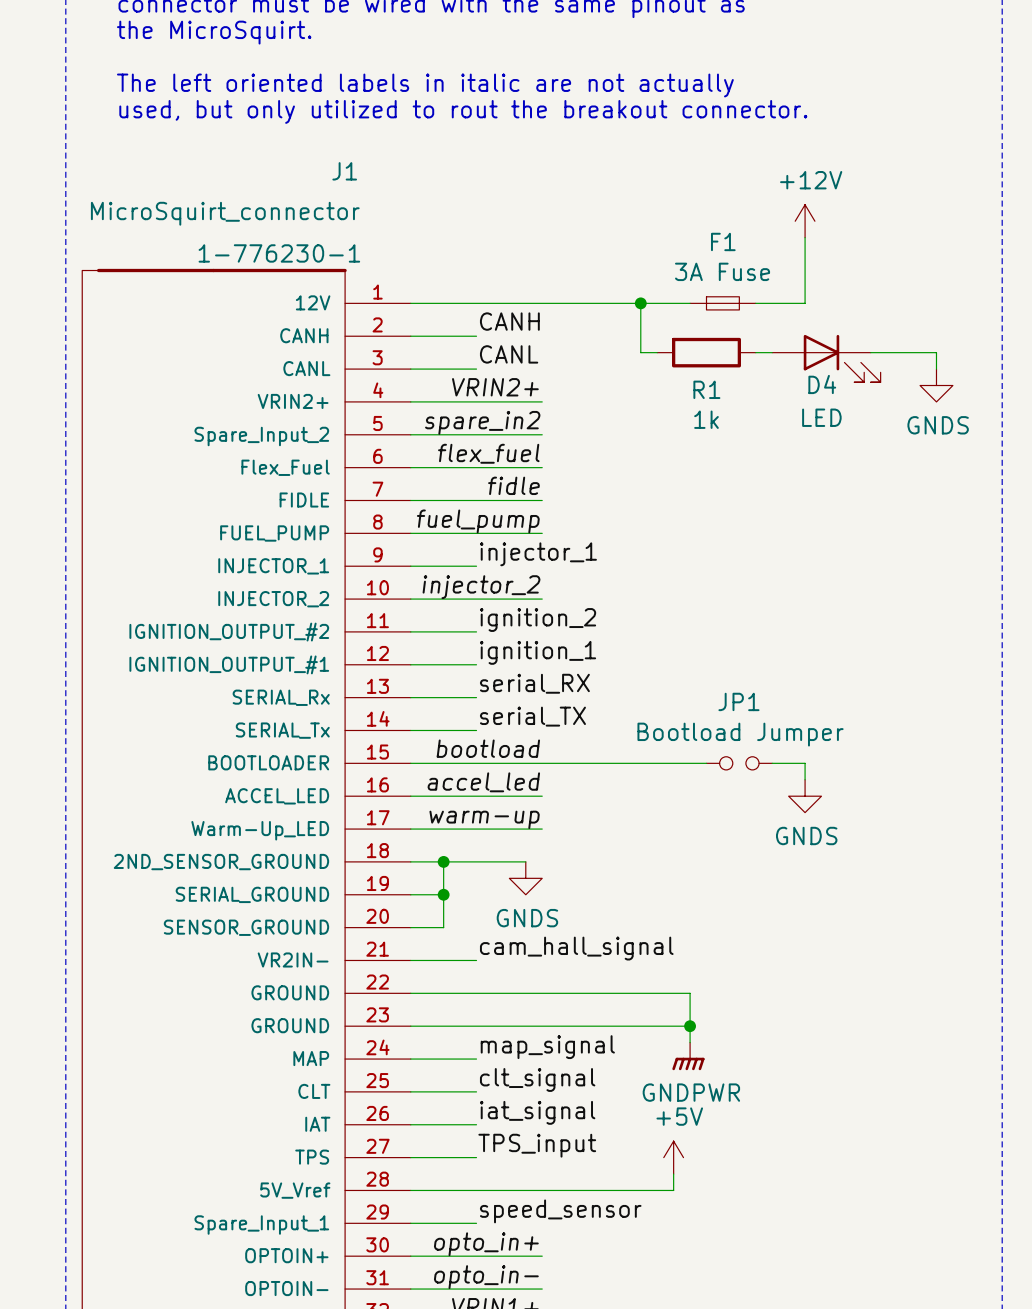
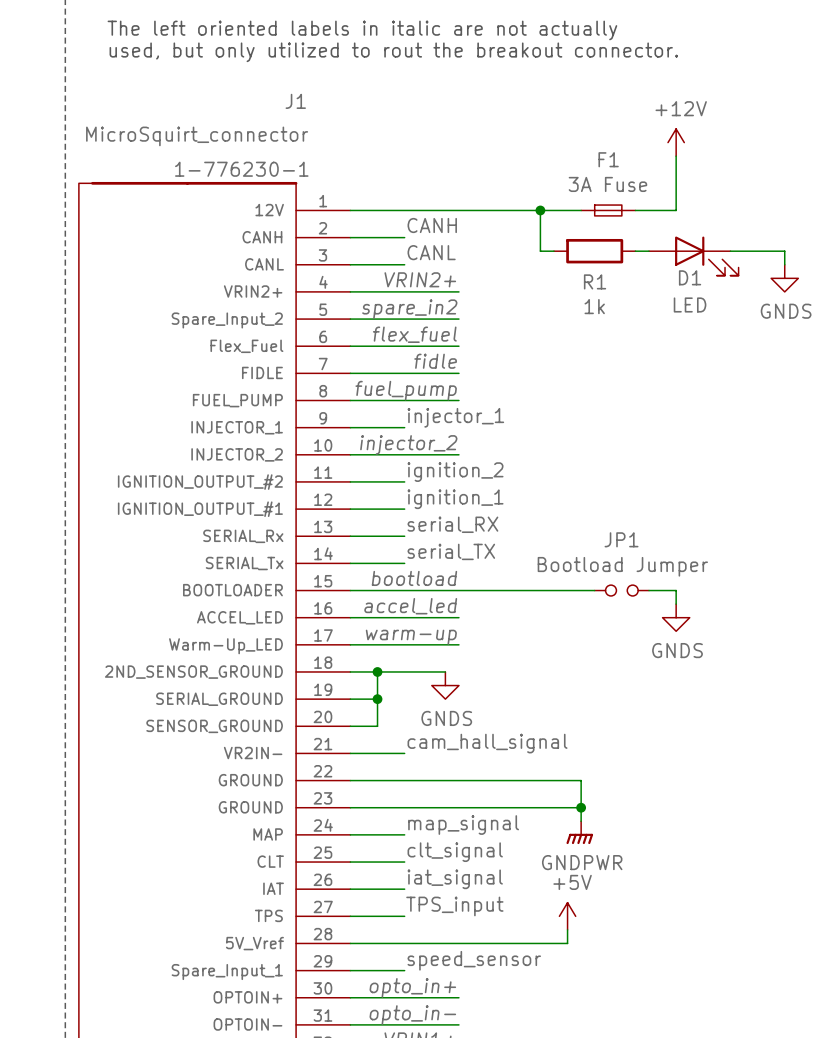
D4 name: D4 (822, 384) -> D1 (690, 277)

